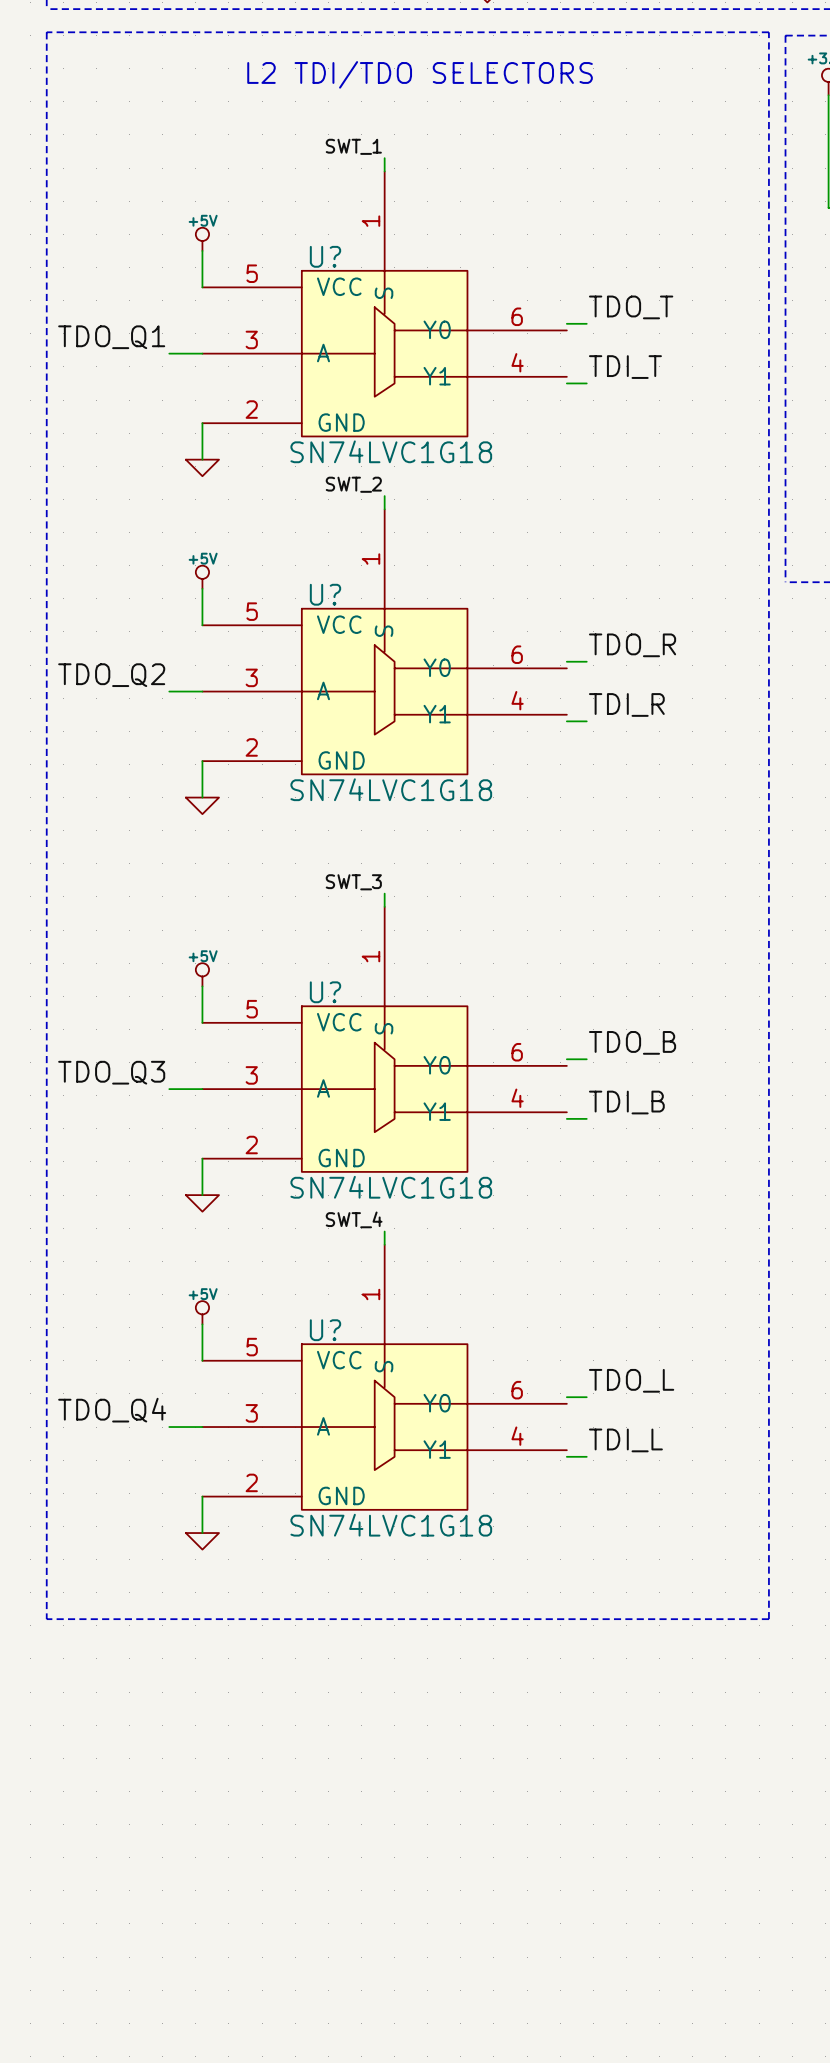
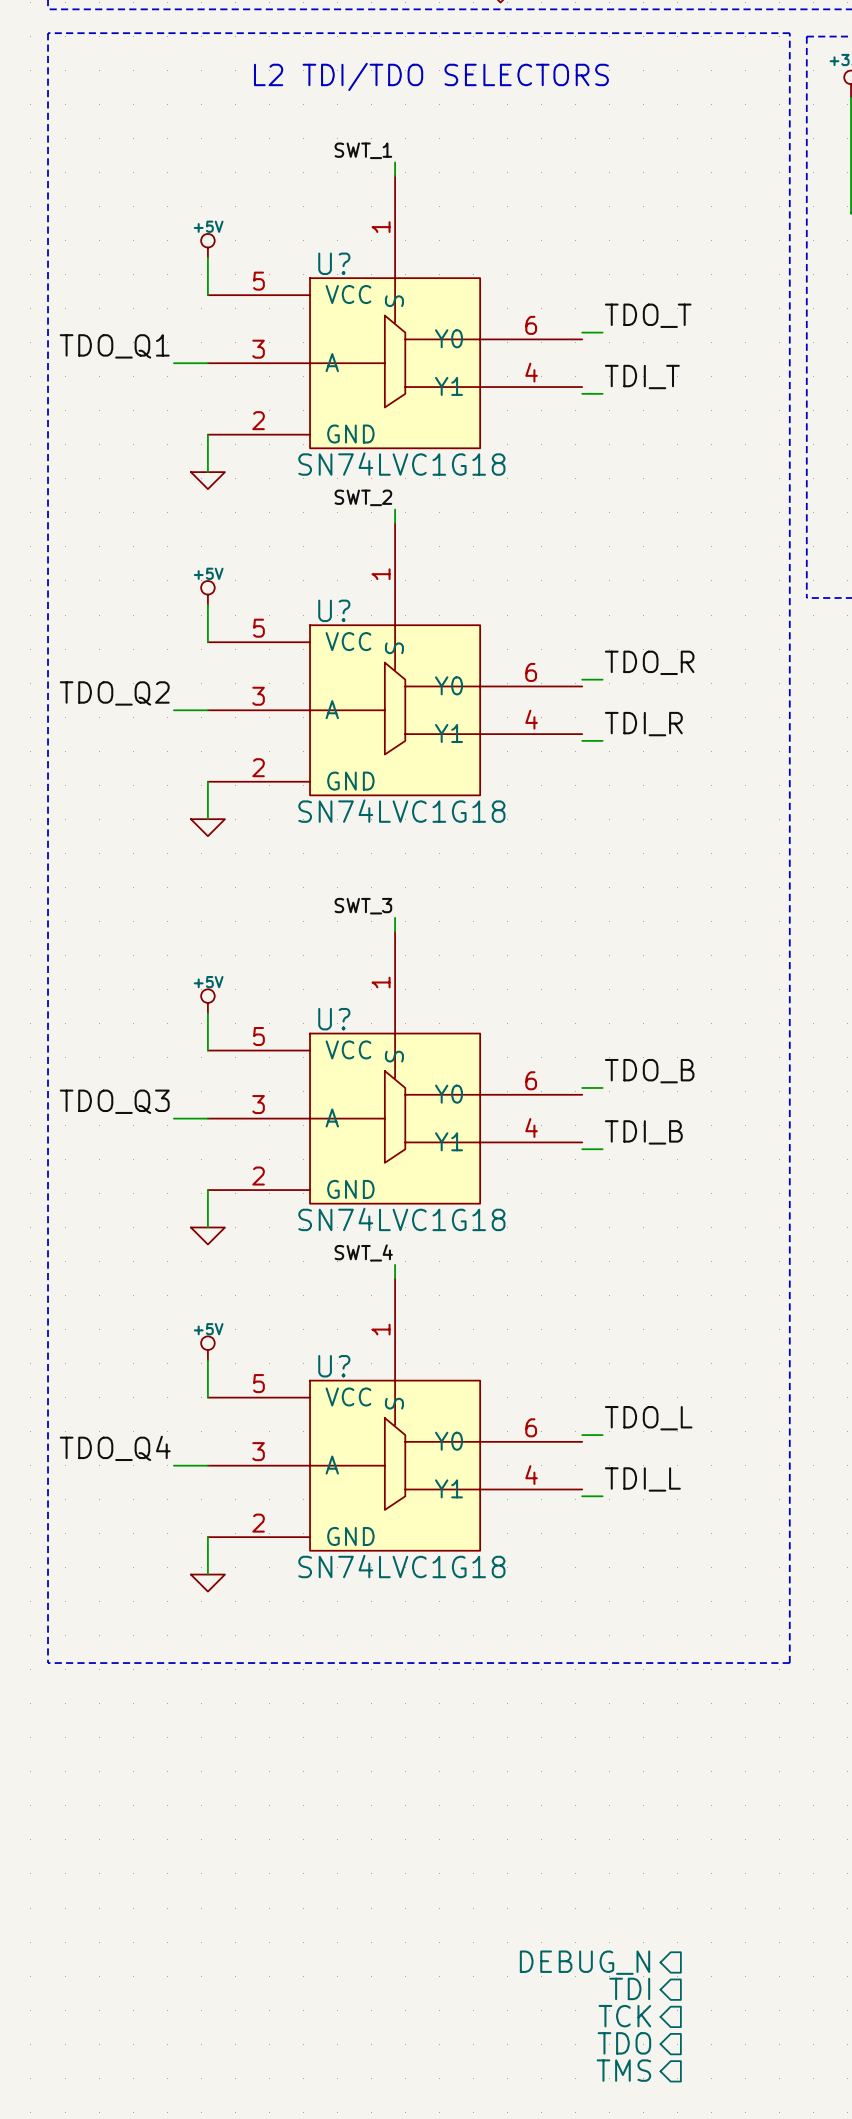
sheet pin: none -> DEBUG_N (585, 1962)
sheet pin: none -> TDI (629, 1988)
sheet pin: none -> TCK (624, 2016)
sheet pin: none -> TDO (624, 2043)
sheet pin: none -> TMS (623, 2070)

